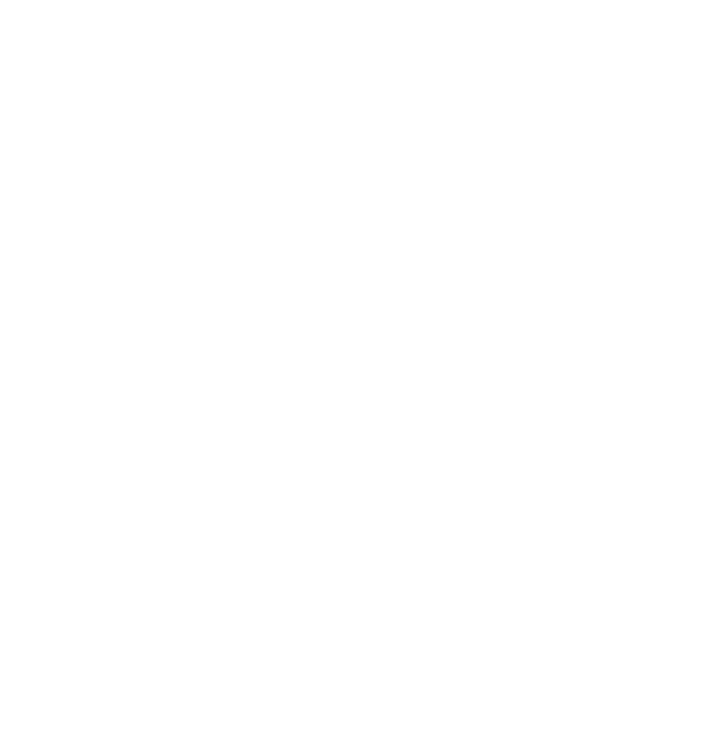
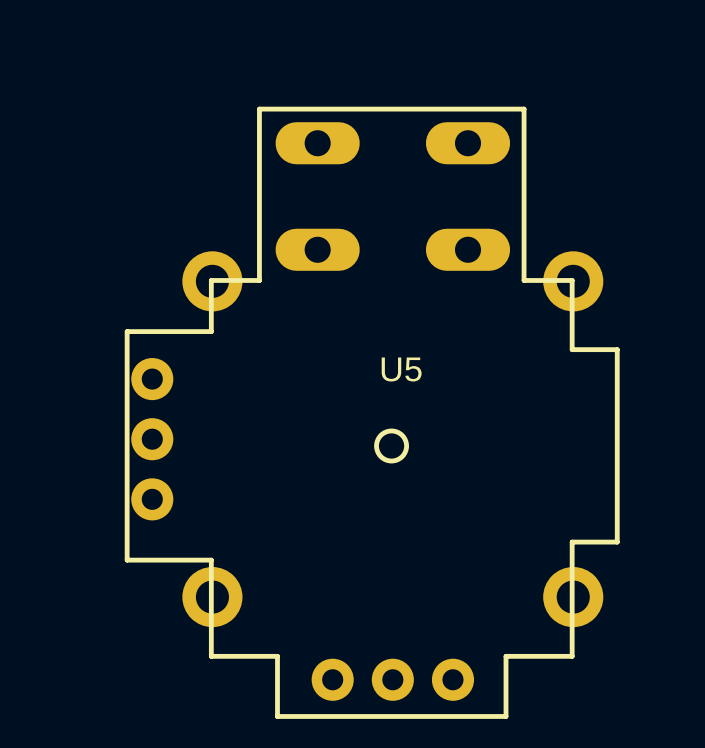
U5: none -> (372, 412)

